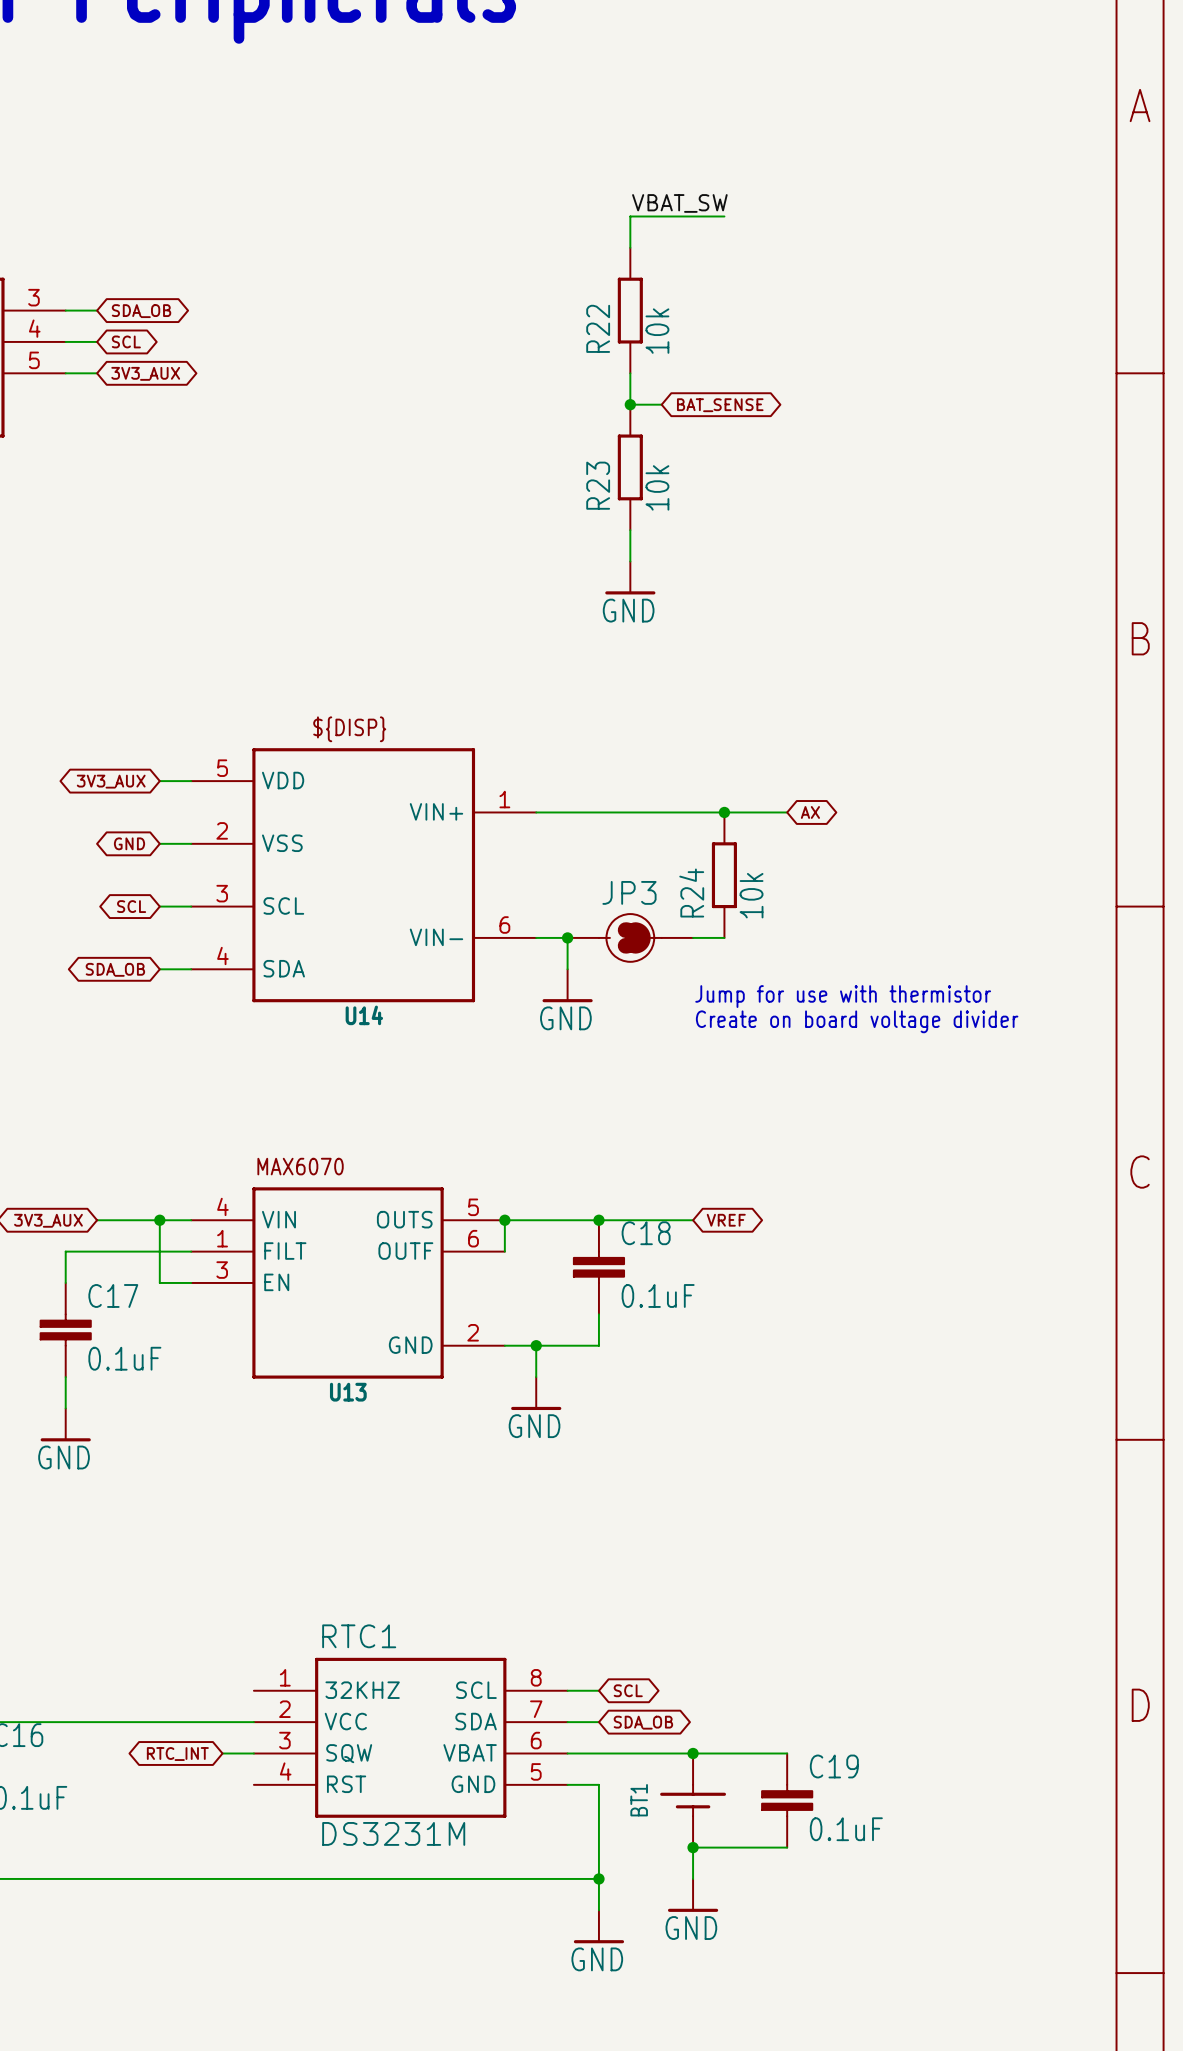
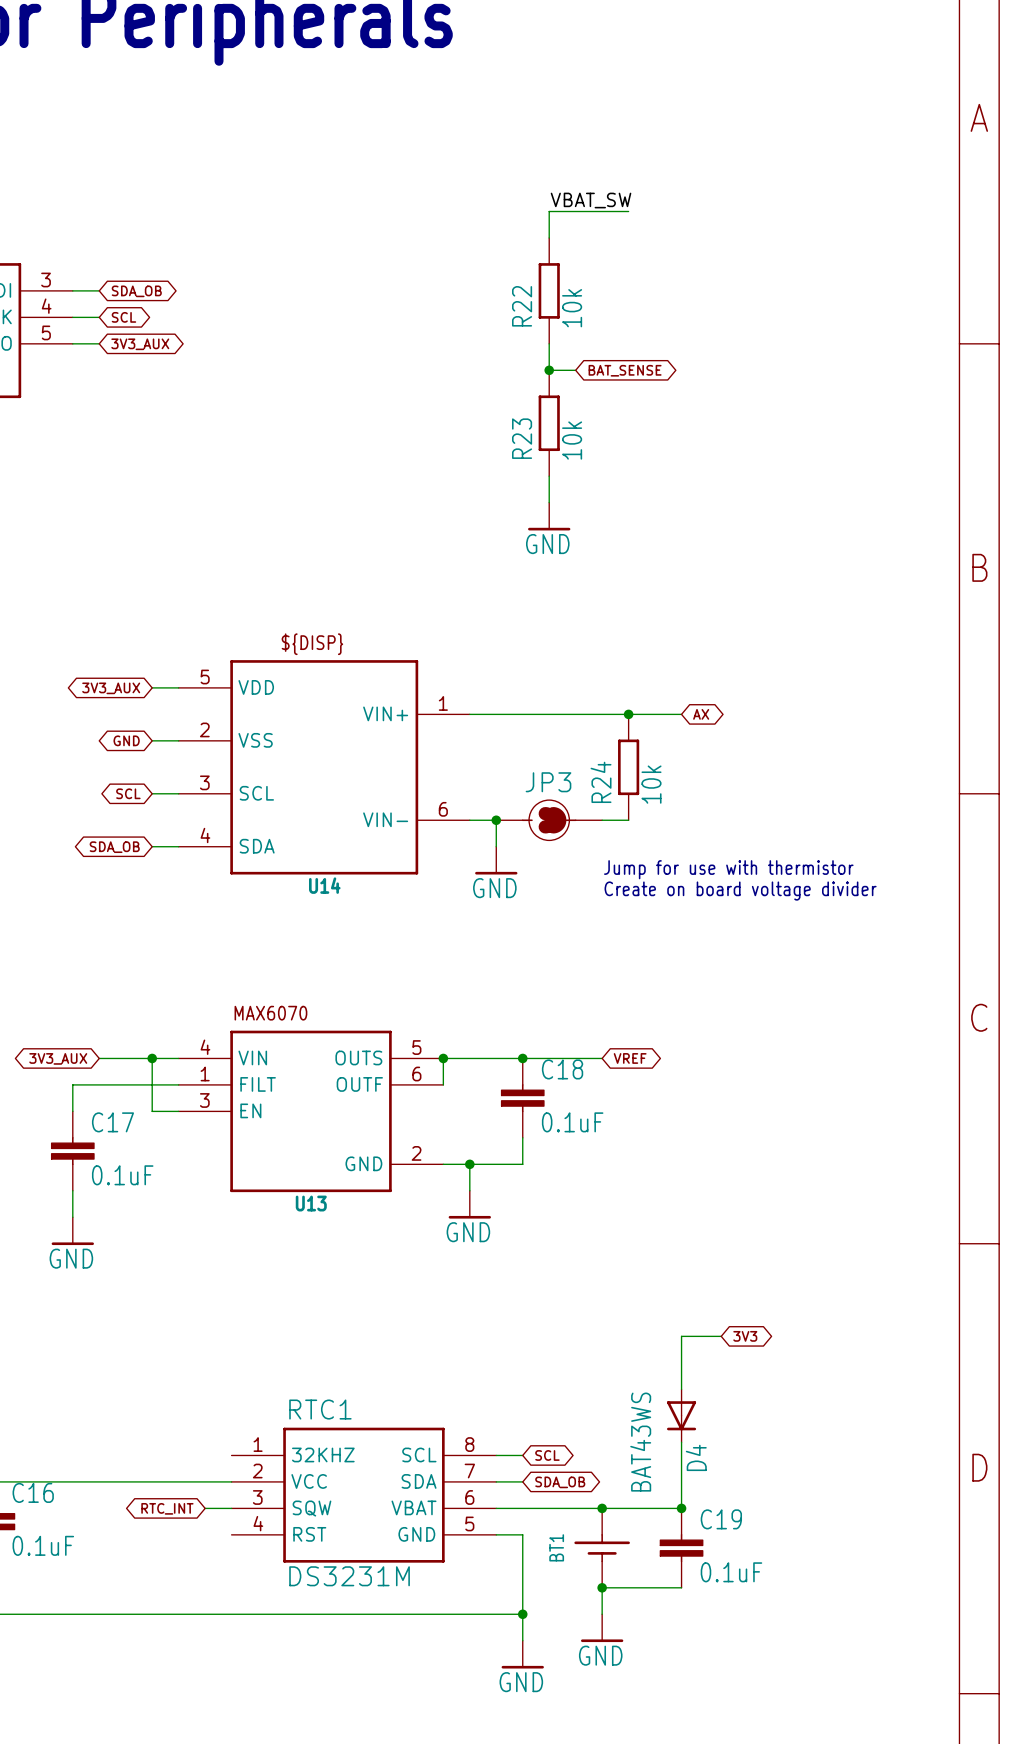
wire: none -> (721, 1336) (681, 1336) (681, 1389)
global label: none -> 3V3 (745, 1336)
D4: none -> BAT43WS (681, 1415)
wire: none -> (681, 1442) (681, 1508)
junction: none -> (681, 1508)

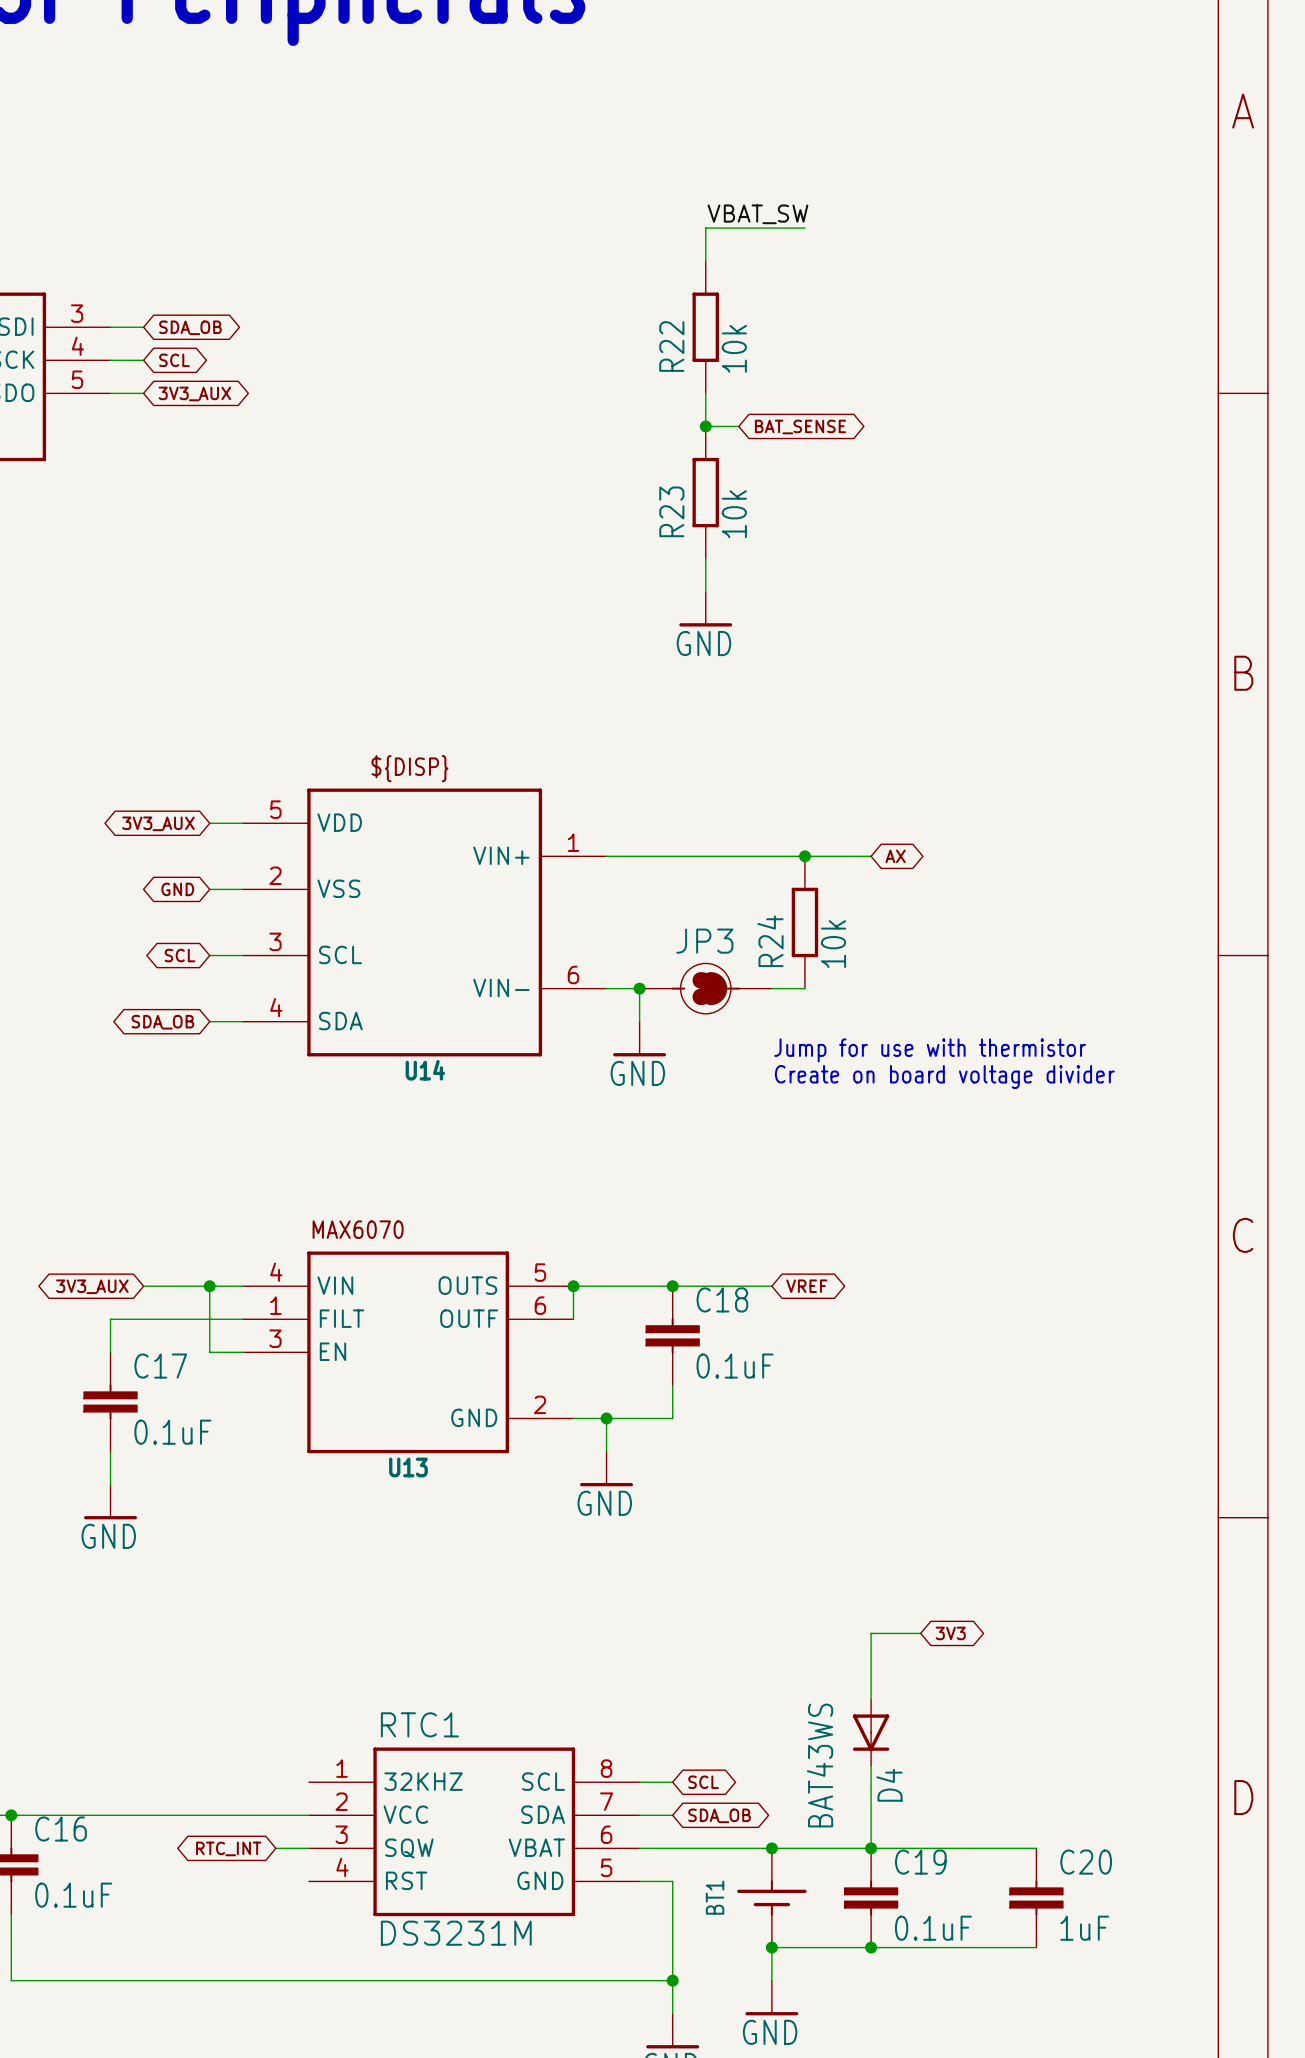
wire: none -> (871, 1848) (1036, 1848)
C20: none -> 1uF (1036, 1897)
wire: none -> (871, 1947) (1036, 1947)
junction: none -> (871, 1947)

